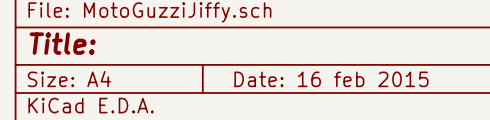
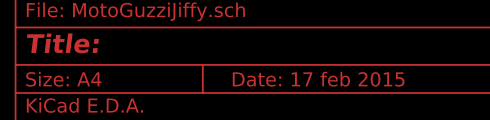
title block: Date: 16 feb 2015 (331, 79) -> Date: 17 feb 2015 (318, 79)

